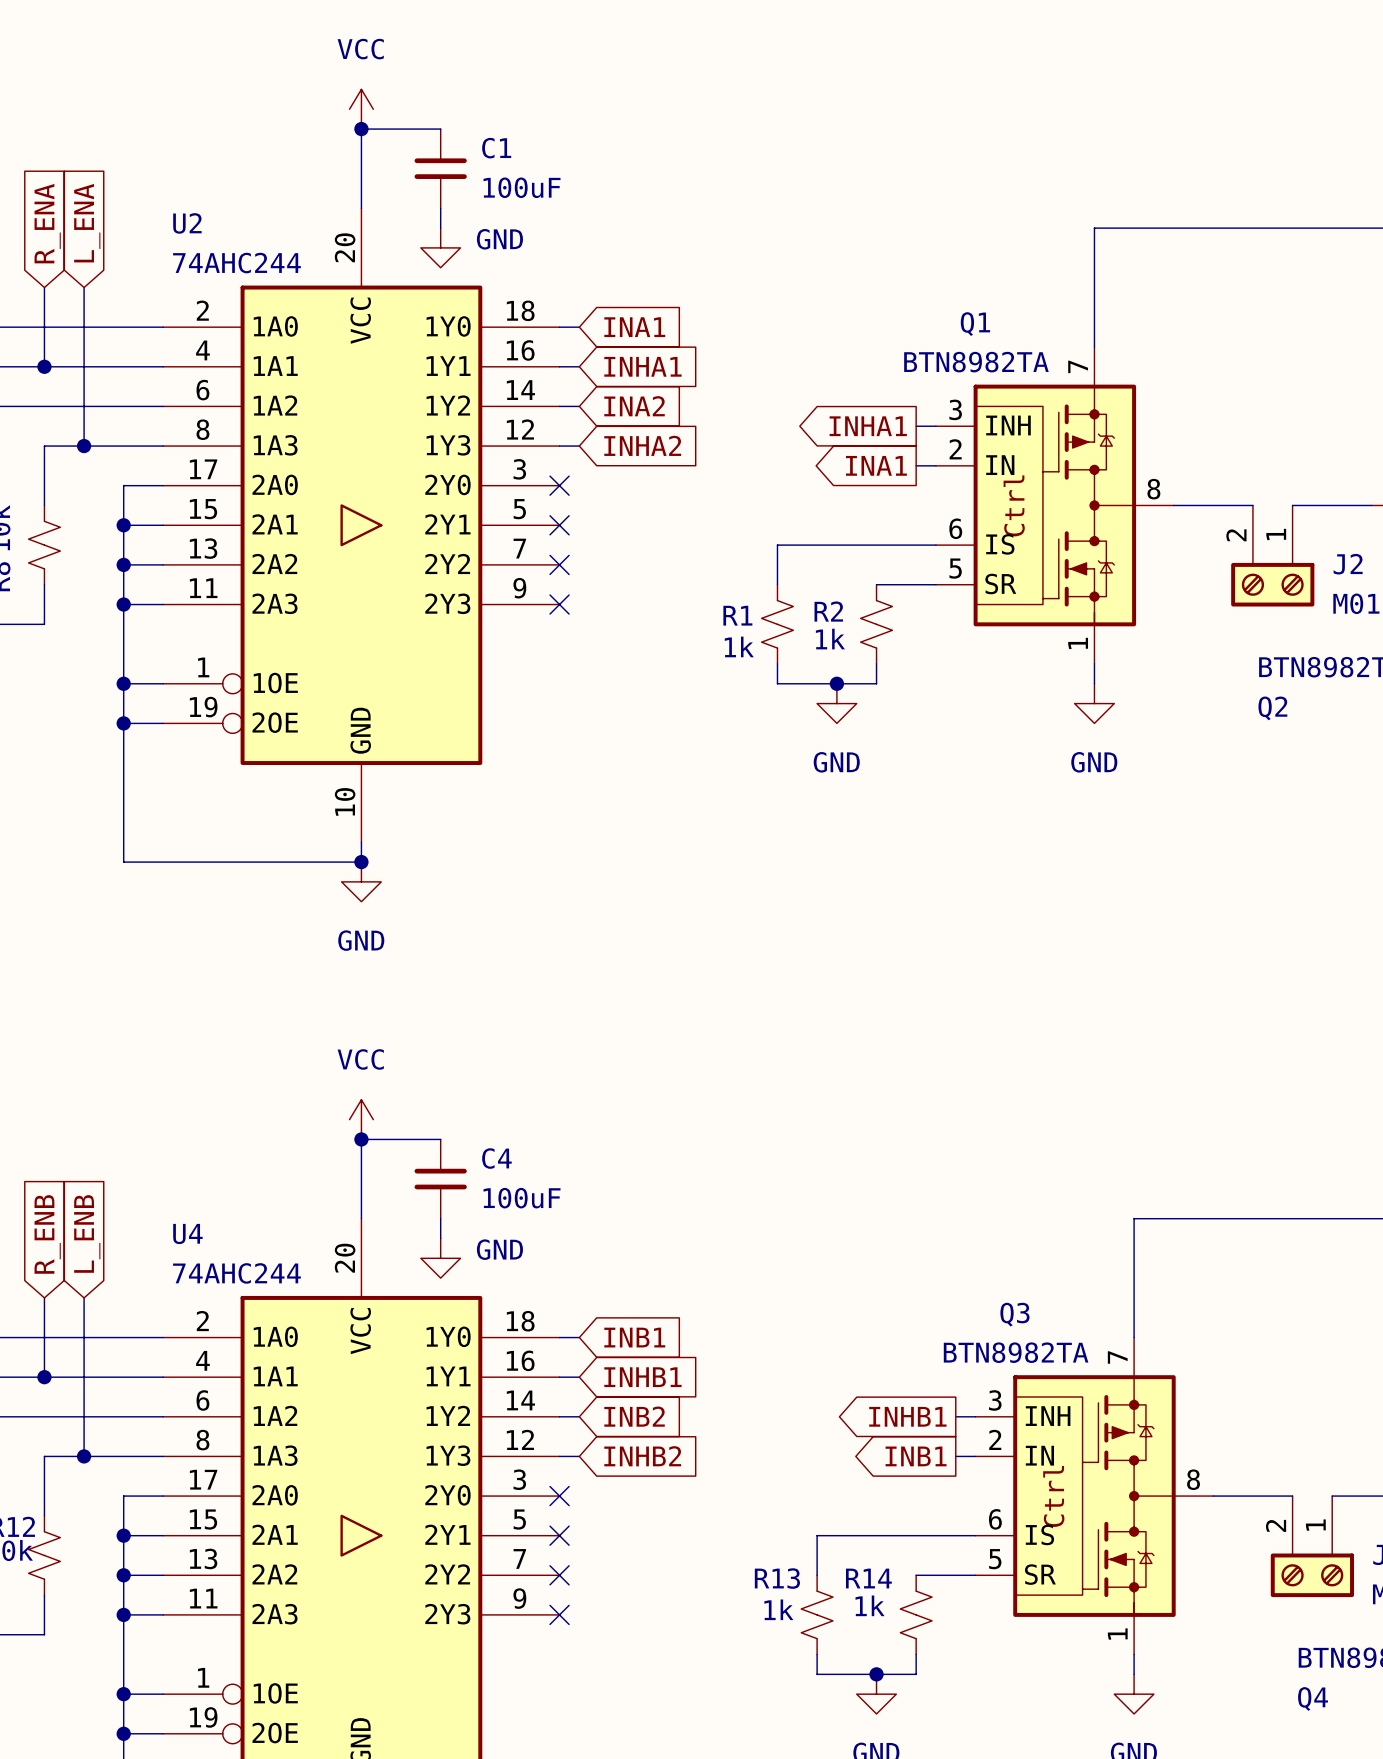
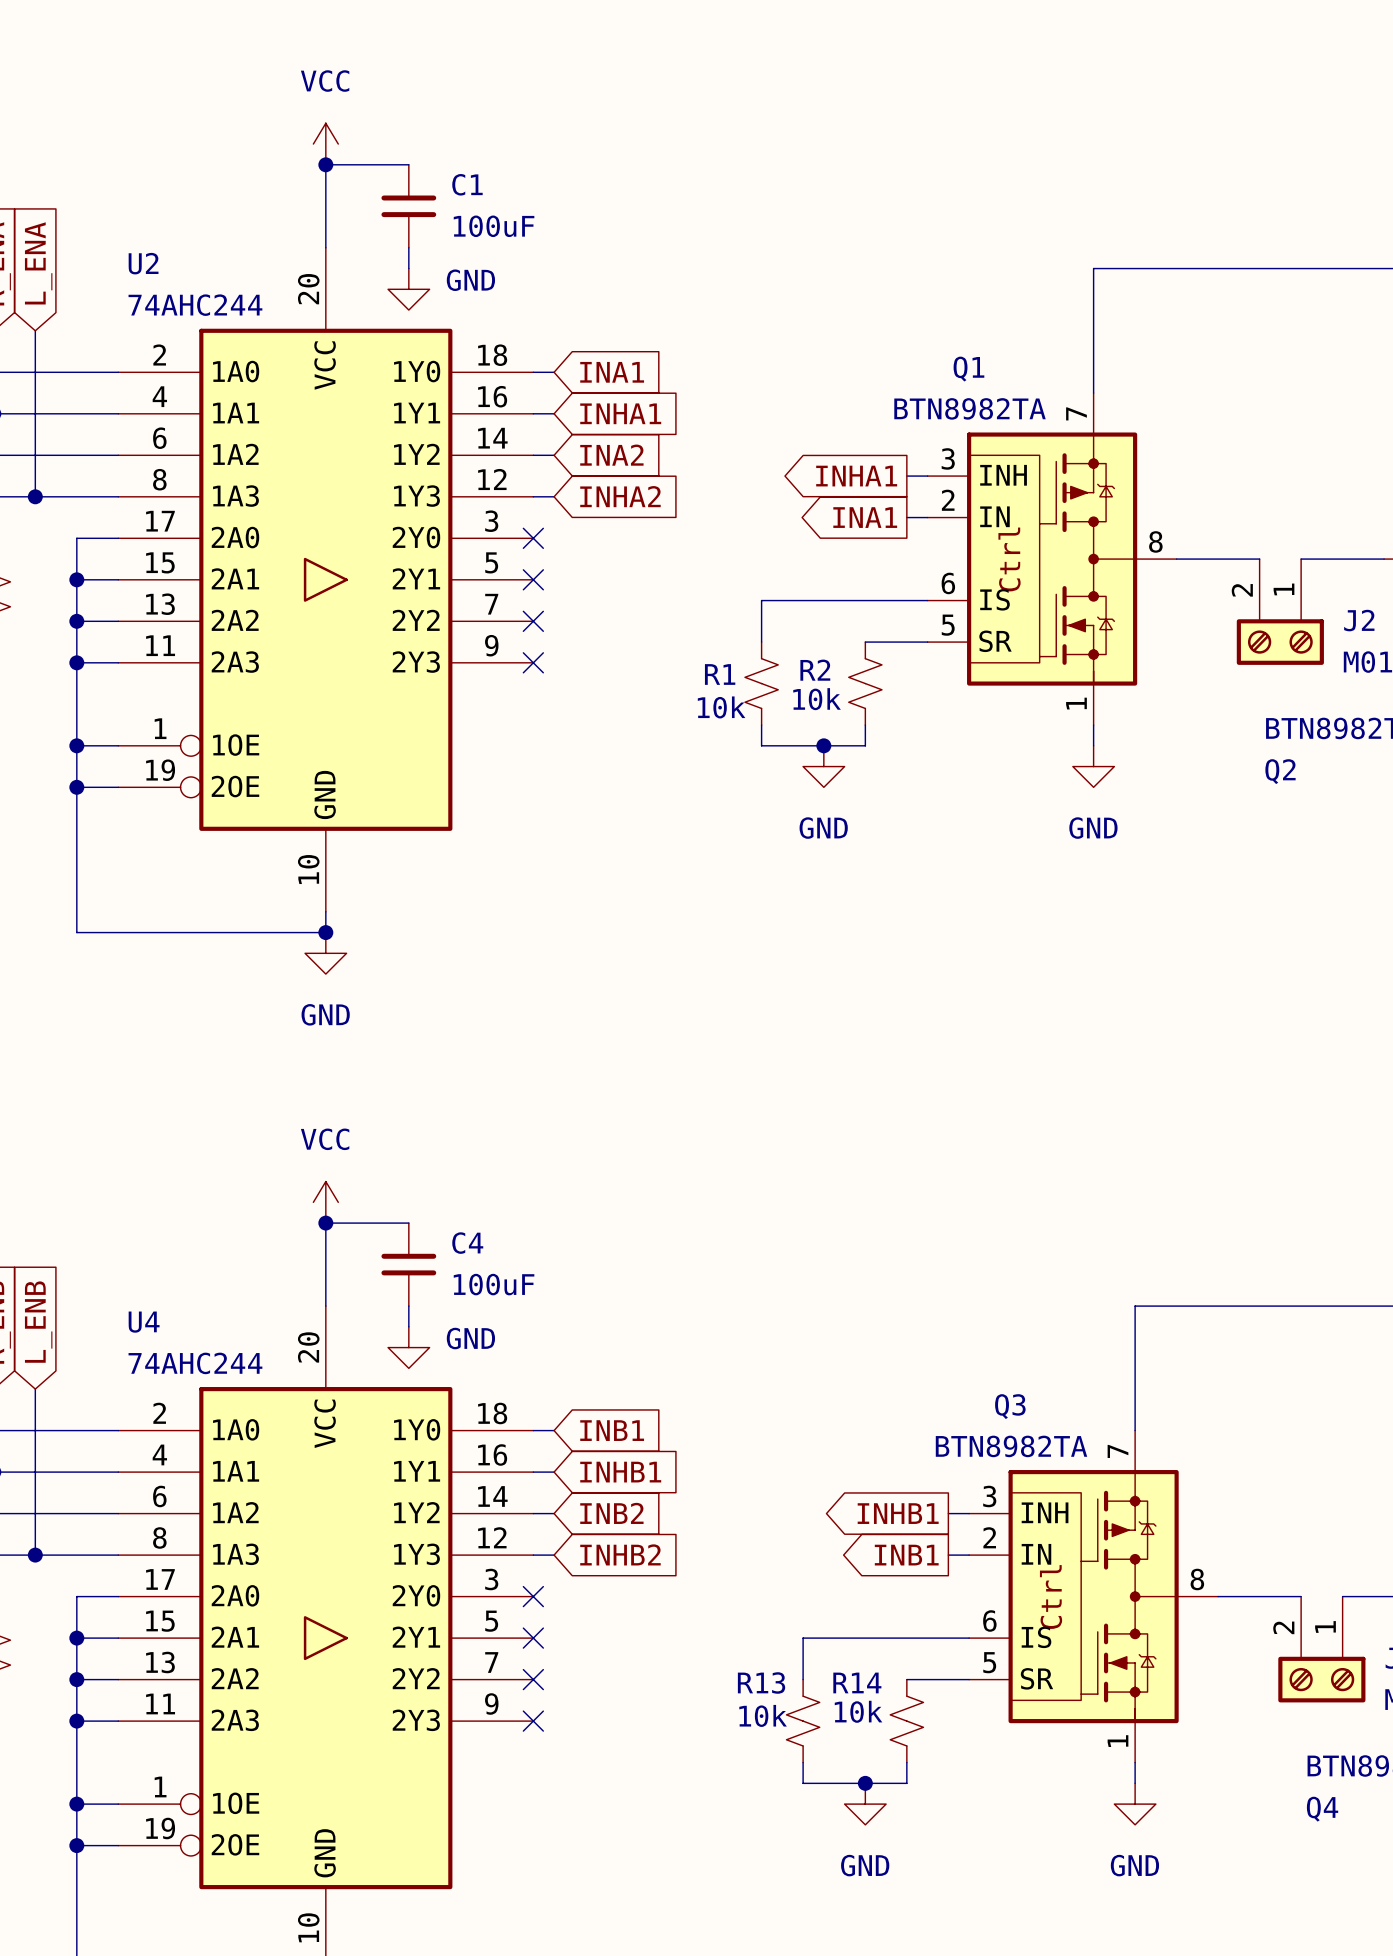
R2 value: 1k (830, 639) -> 10k (817, 699)
R1 value: 1k (739, 646) -> 10k (721, 707)
R14 value: 1k (870, 1605) -> 10k (858, 1711)
R13 value: 1k (778, 1609) -> 10k (763, 1715)

